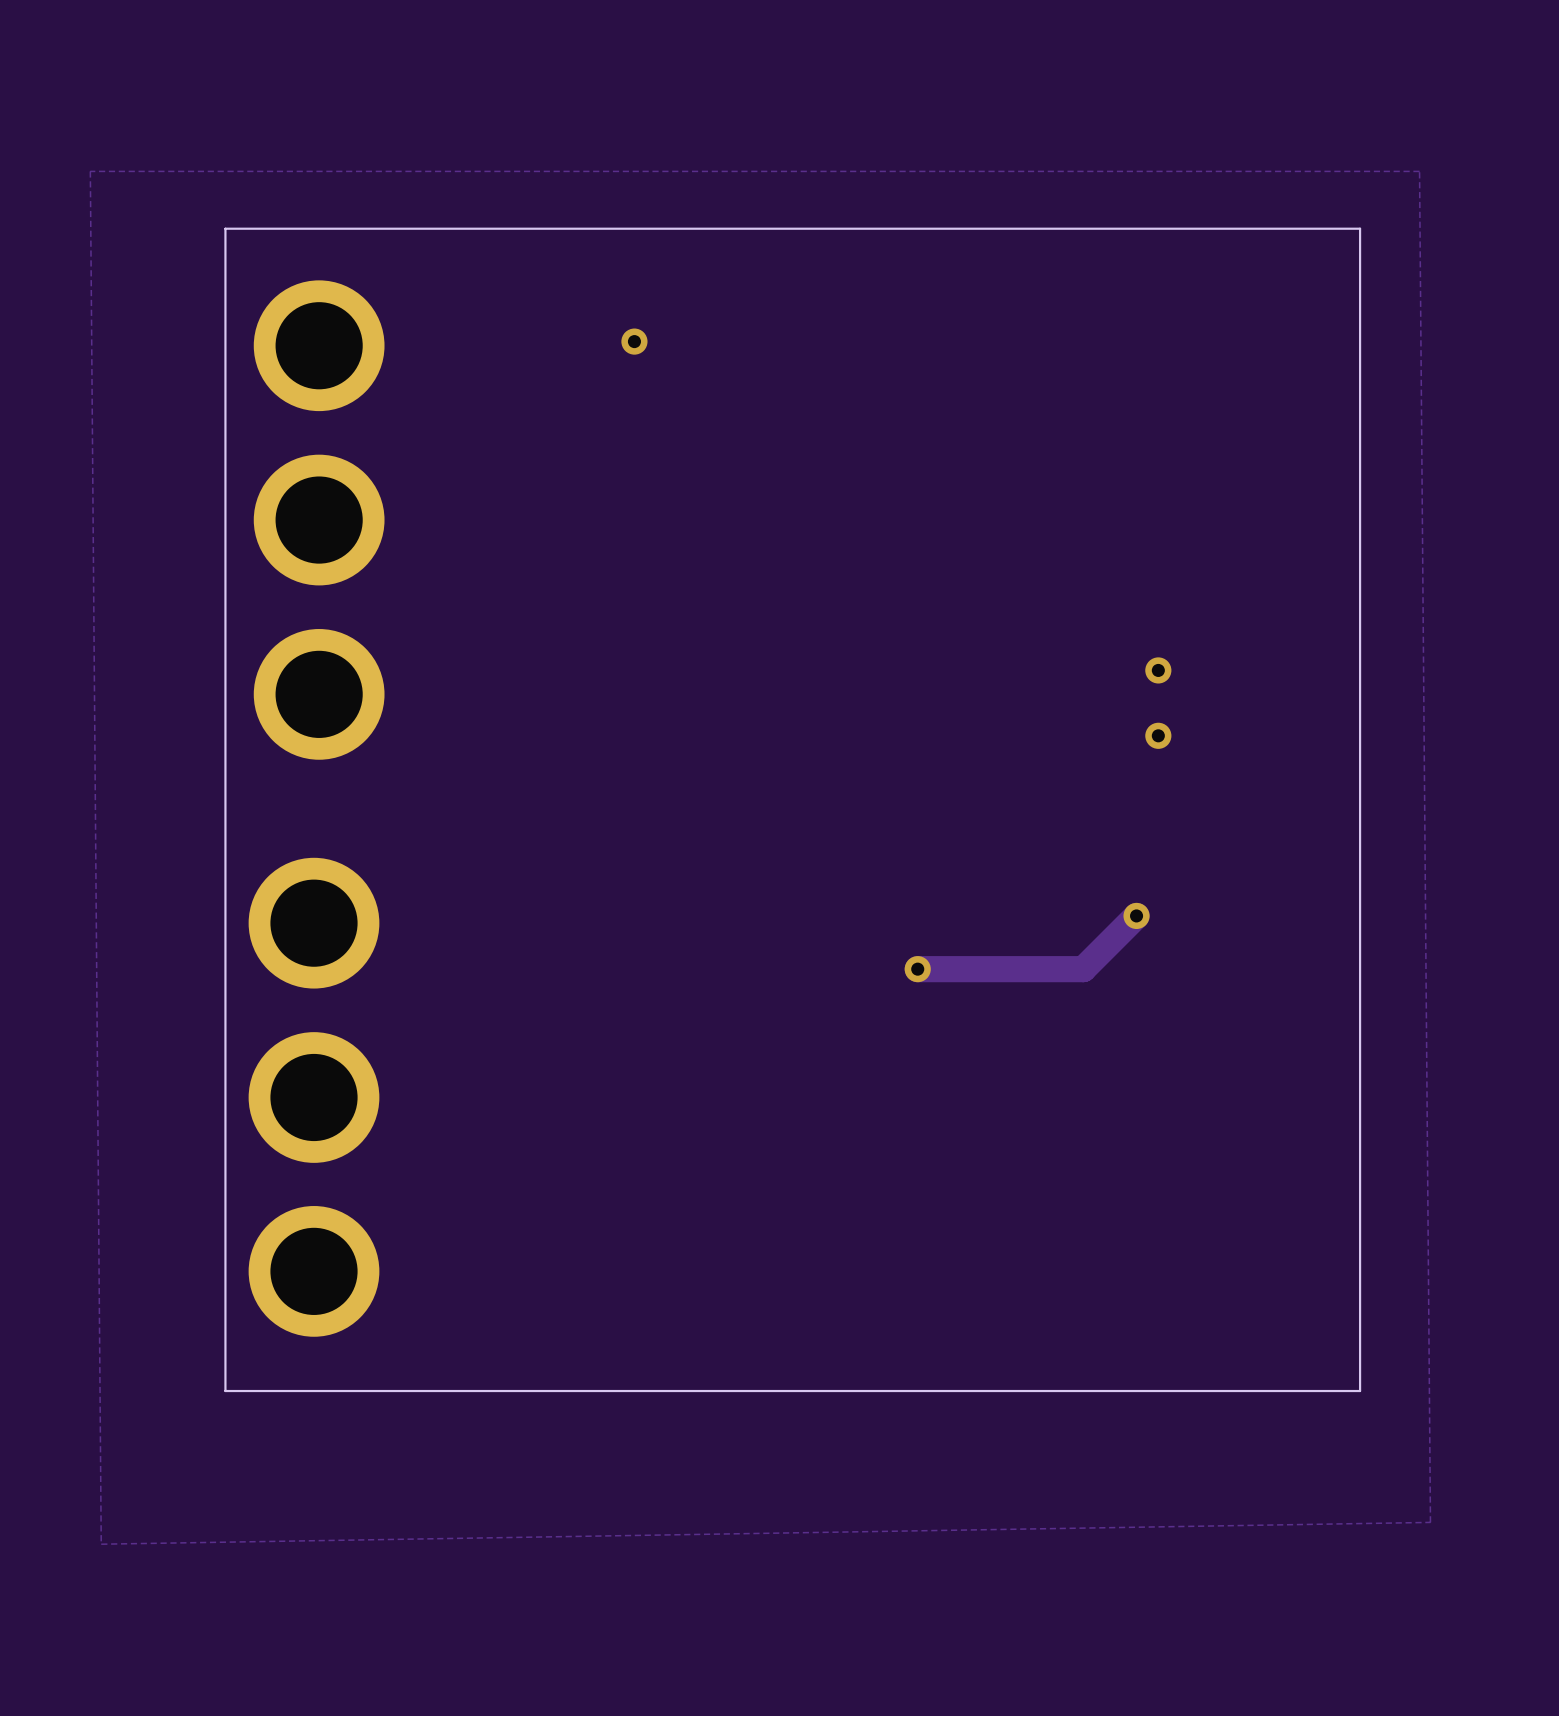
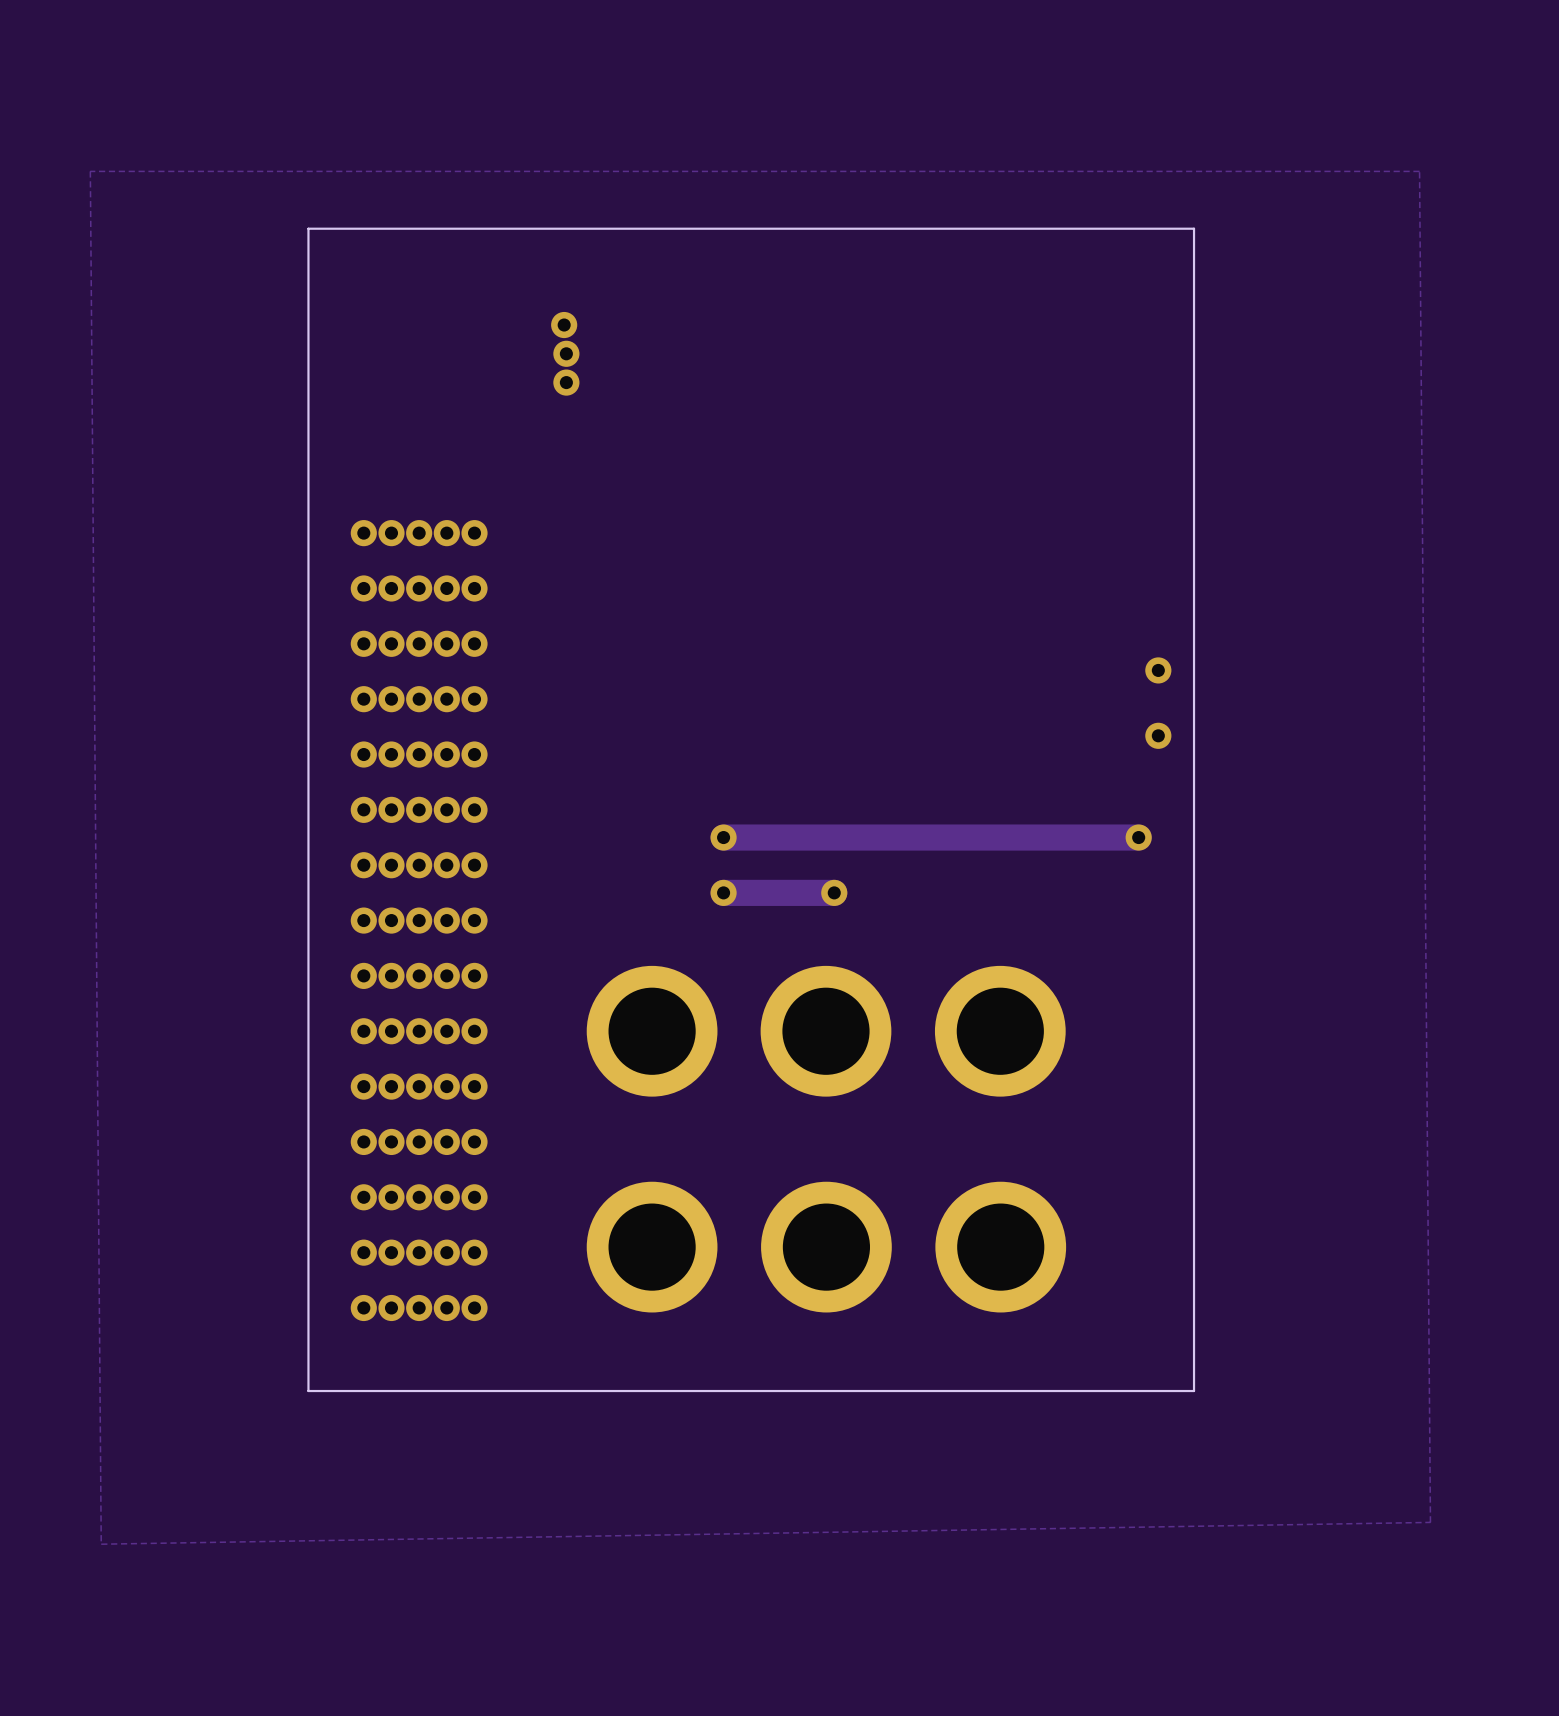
board edge: (308, 228) (225, 228) (225, 1391) (308, 1391) -> (308, 228) (308, 1391)
board edge: (1194, 228) (1360, 228) (1360, 1391) (1194, 1391) -> (1194, 228) (1194, 1391)
via: none -> (564, 325)
via: (634, 341) -> none
part: (319, 345) -> none
via: none -> (566, 353)
via: none -> (566, 382)
part: (319, 520) -> none
via: none -> (363, 533)
via: none -> (391, 533)
via: none -> (419, 533)
via: none -> (446, 533)
via: none -> (474, 533)
via: none -> (363, 588)
via: none -> (391, 588)
via: none -> (419, 588)
via: none -> (446, 588)
via: none -> (474, 588)
via: none -> (363, 643)
via: none -> (391, 643)
via: none -> (419, 643)
via: none -> (446, 643)
via: none -> (474, 643)
part: (319, 694) -> none
via: none -> (363, 699)
via: none -> (391, 699)
via: none -> (419, 699)
via: none -> (446, 699)
via: none -> (474, 699)
via: none -> (363, 754)
via: none -> (391, 754)
via: none -> (419, 754)
via: none -> (446, 754)
via: none -> (474, 754)
via: none -> (363, 809)
via: none -> (391, 809)
via: none -> (419, 809)
via: none -> (446, 809)
via: none -> (474, 809)
via: none -> (723, 837)
track: none -> (1138, 837) (723, 837)
via: none -> (363, 865)
via: none -> (391, 865)
via: none -> (419, 865)
via: none -> (446, 865)
via: none -> (474, 865)
via: none -> (723, 892)
track: none -> (834, 892) (723, 892)
via: none -> (834, 892)
track: (1136, 915) (1083, 969) (917, 969) -> none
via position: (1136, 915) -> (1138, 837)
via: none -> (363, 920)
via: none -> (391, 920)
via: none -> (419, 920)
via: none -> (446, 920)
via: none -> (474, 920)
part: (314, 923) -> none
via: (917, 969) -> none
via: none -> (363, 975)
via: none -> (391, 975)
via: none -> (419, 975)
via: none -> (446, 975)
via: none -> (474, 975)
via: none -> (363, 1031)
via: none -> (391, 1031)
via: none -> (419, 1031)
via: none -> (446, 1031)
via: none -> (474, 1031)
part: none -> (652, 1031)
part: none -> (825, 1031)
part: none -> (1000, 1031)
via: none -> (363, 1086)
via: none -> (391, 1086)
via: none -> (419, 1086)
via: none -> (446, 1086)
via: none -> (474, 1086)
part: (314, 1097) -> none
via: none -> (363, 1141)
via: none -> (391, 1141)
via: none -> (419, 1141)
via: none -> (446, 1141)
via: none -> (474, 1141)
via: none -> (363, 1197)
via: none -> (391, 1197)
via: none -> (419, 1197)
via: none -> (446, 1197)
via: none -> (474, 1197)
part: none -> (652, 1247)
part: none -> (826, 1247)
part: none -> (1000, 1247)
via: none -> (363, 1252)
via: none -> (391, 1252)
via: none -> (419, 1252)
via: none -> (446, 1252)
via: none -> (474, 1252)
part: (314, 1271) -> none
via: none -> (363, 1307)
via: none -> (391, 1307)
via: none -> (419, 1307)
via: none -> (446, 1307)
via: none -> (474, 1307)

